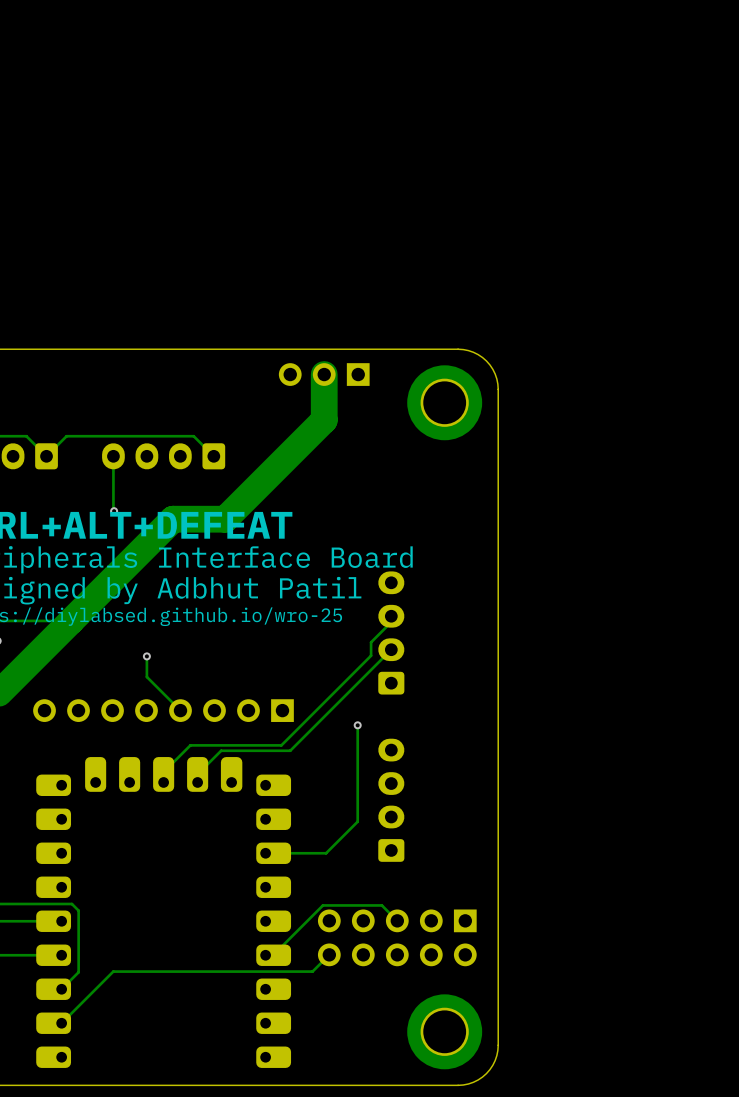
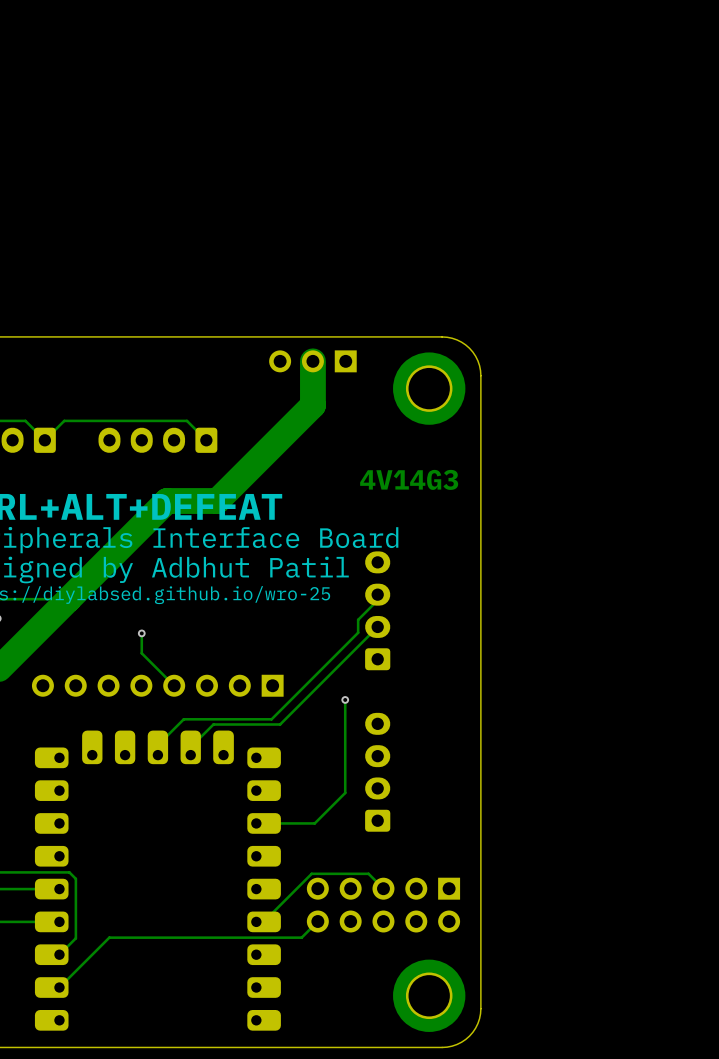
track: (113, 456) (114, 511) -> none
text: none -> 4V14G3 (409, 479)
via: (114, 511) -> none

